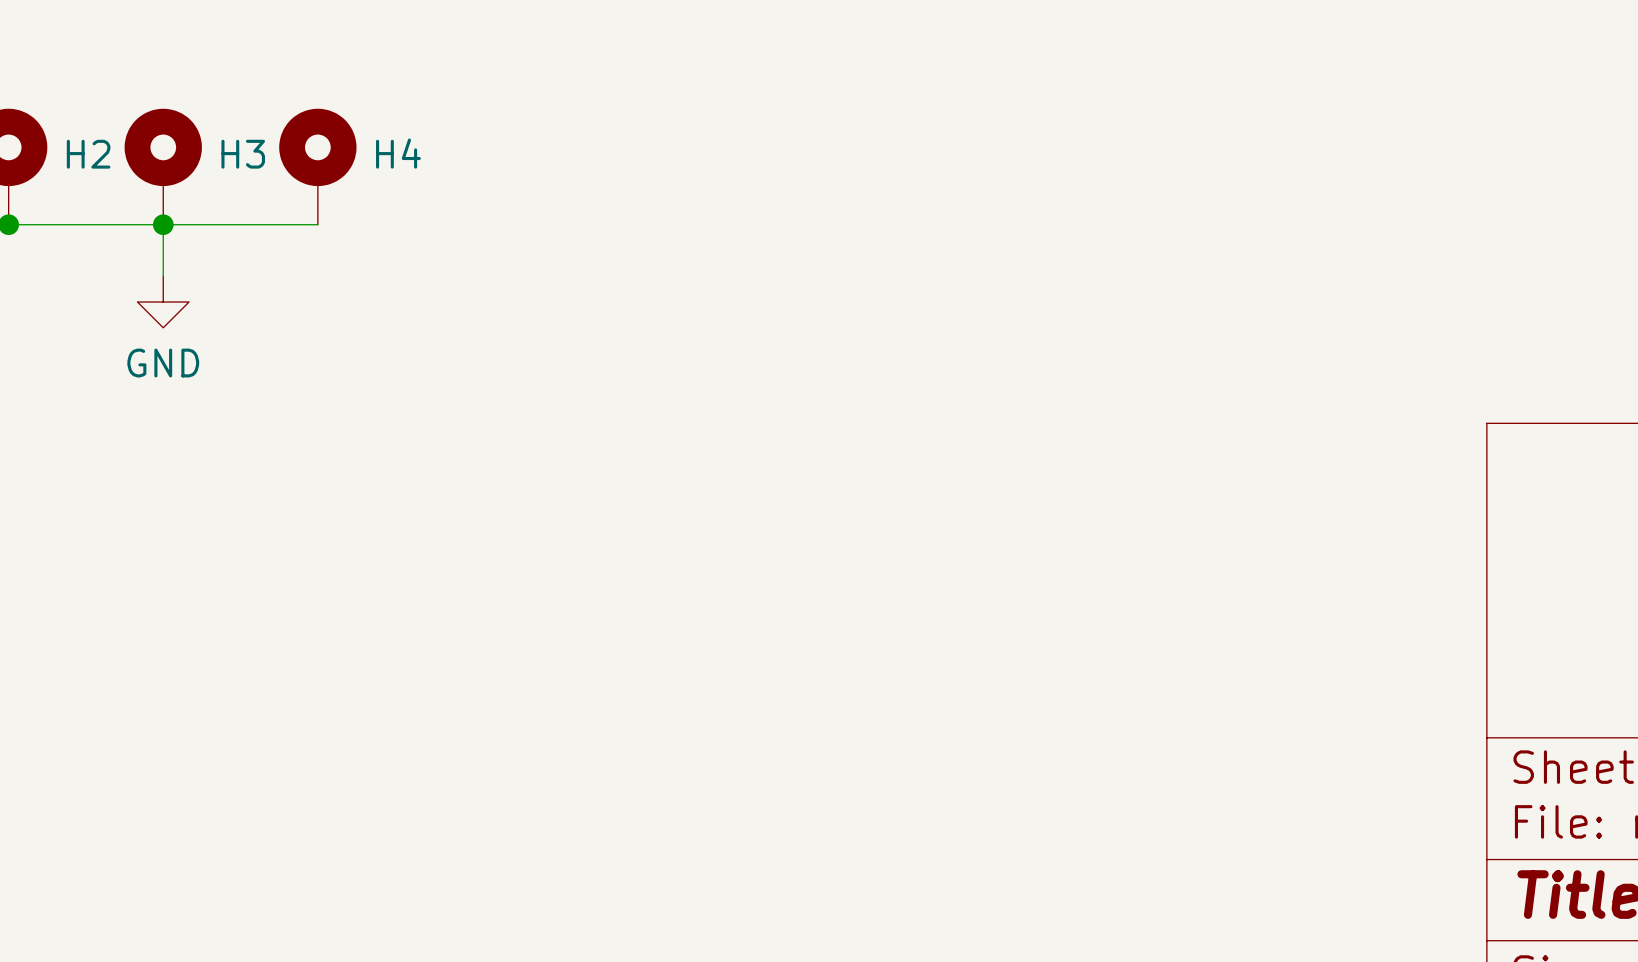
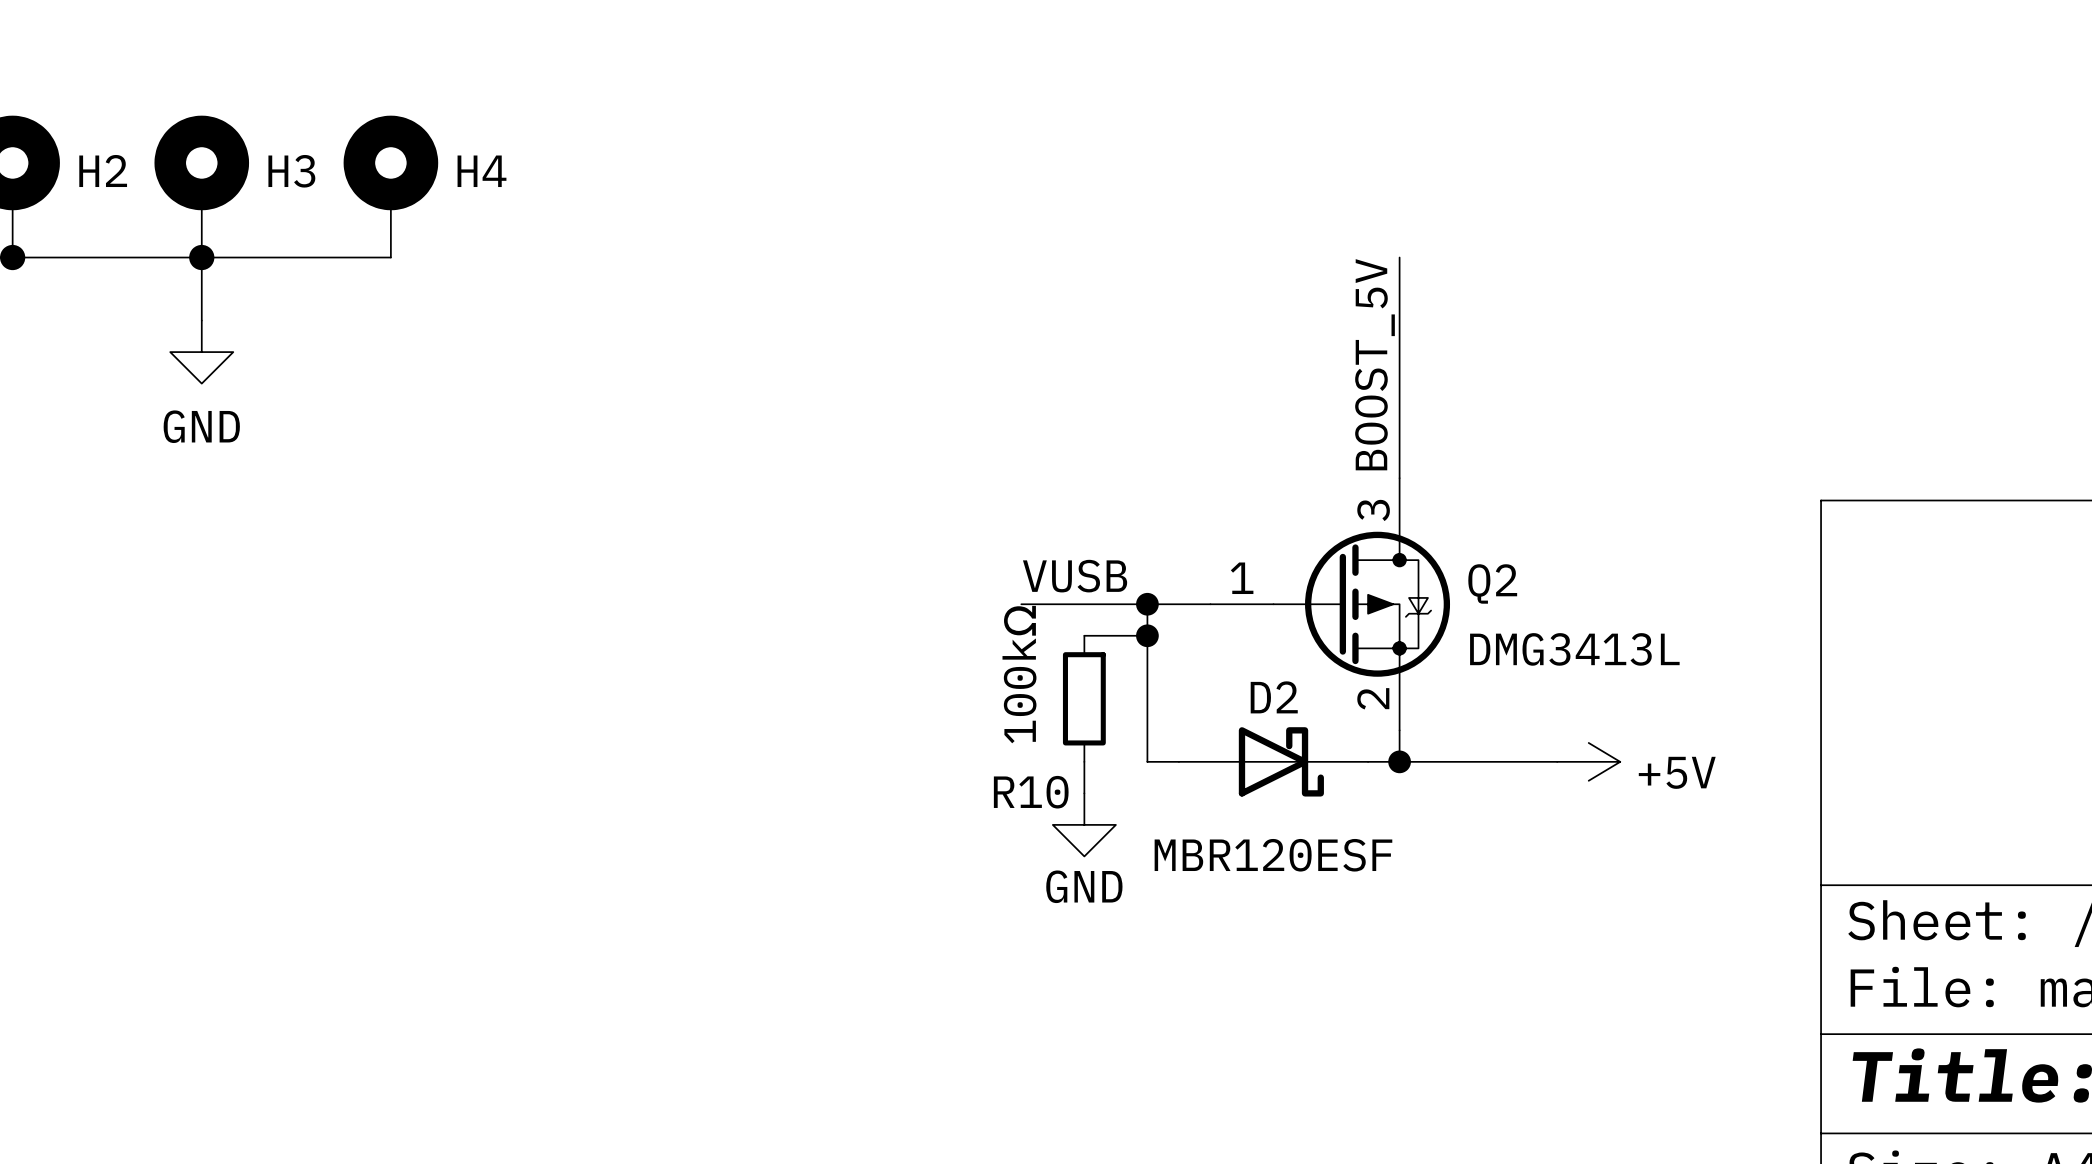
wire: none -> (1399, 257) (1399, 478)
label: none -> BOOST_5V (1375, 364)
label: none -> VUSB (1075, 576)
wire: none -> (1021, 604) (1210, 604)
wire: none -> (1147, 604) (1147, 761) (1178, 761)
junction: none -> (1147, 604)
Q2: none -> DMG3413L (1330, 604)
wire: none -> (1084, 635) (1147, 635)
junction: none -> (1147, 635)
R10: none -> 100kΩ (1084, 698)
wire: none -> (1399, 730) (1399, 761)
wire: none -> (1084, 761) (1084, 793)
D2: none -> MBR120ESF (1273, 761)
wire: none -> (1368, 761) (1557, 761)
junction: none -> (1399, 761)
power symbol: none -> +5V (1588, 761)
power symbol: none -> GND (1084, 824)

